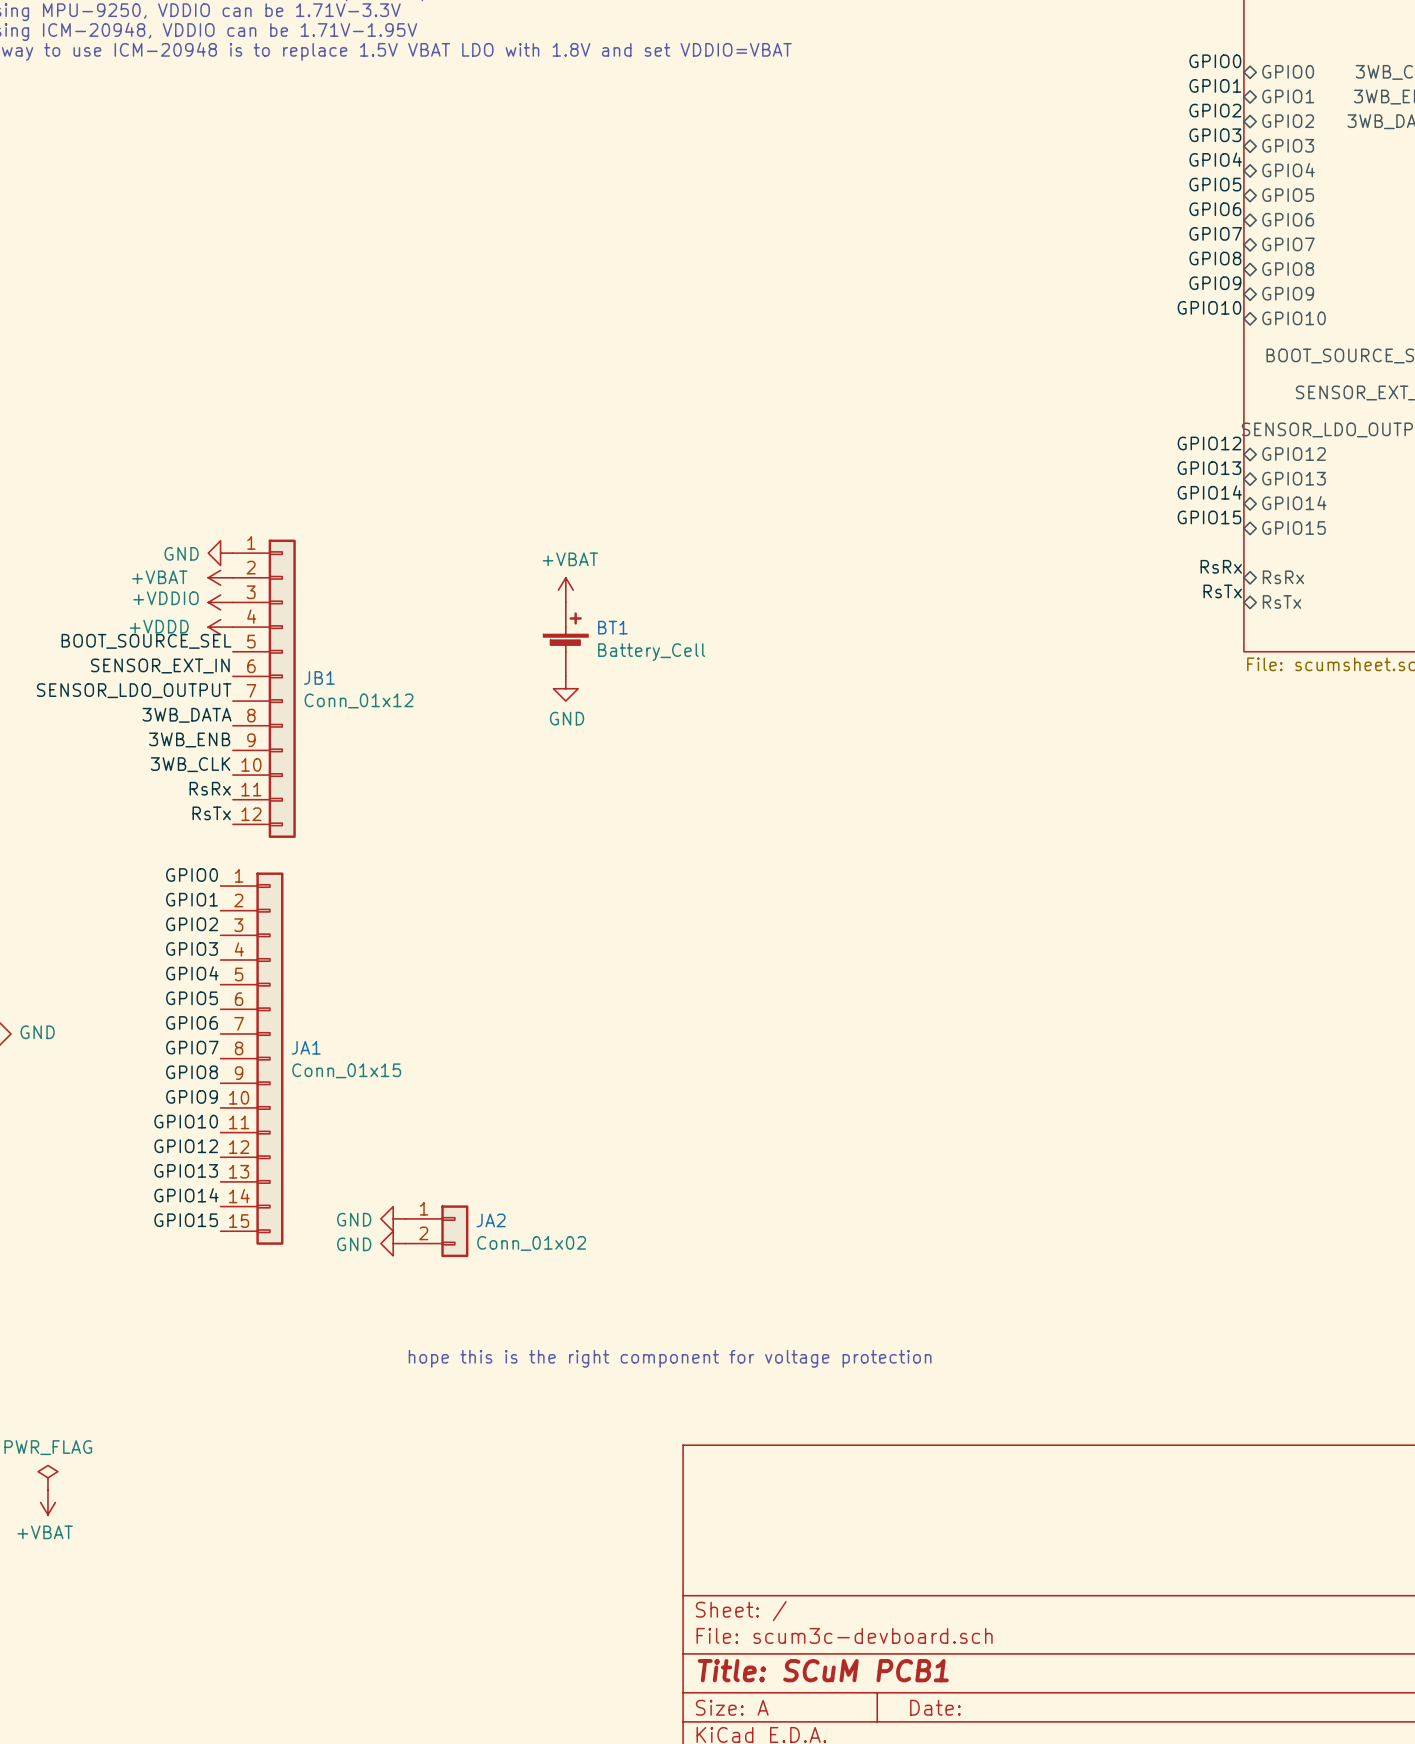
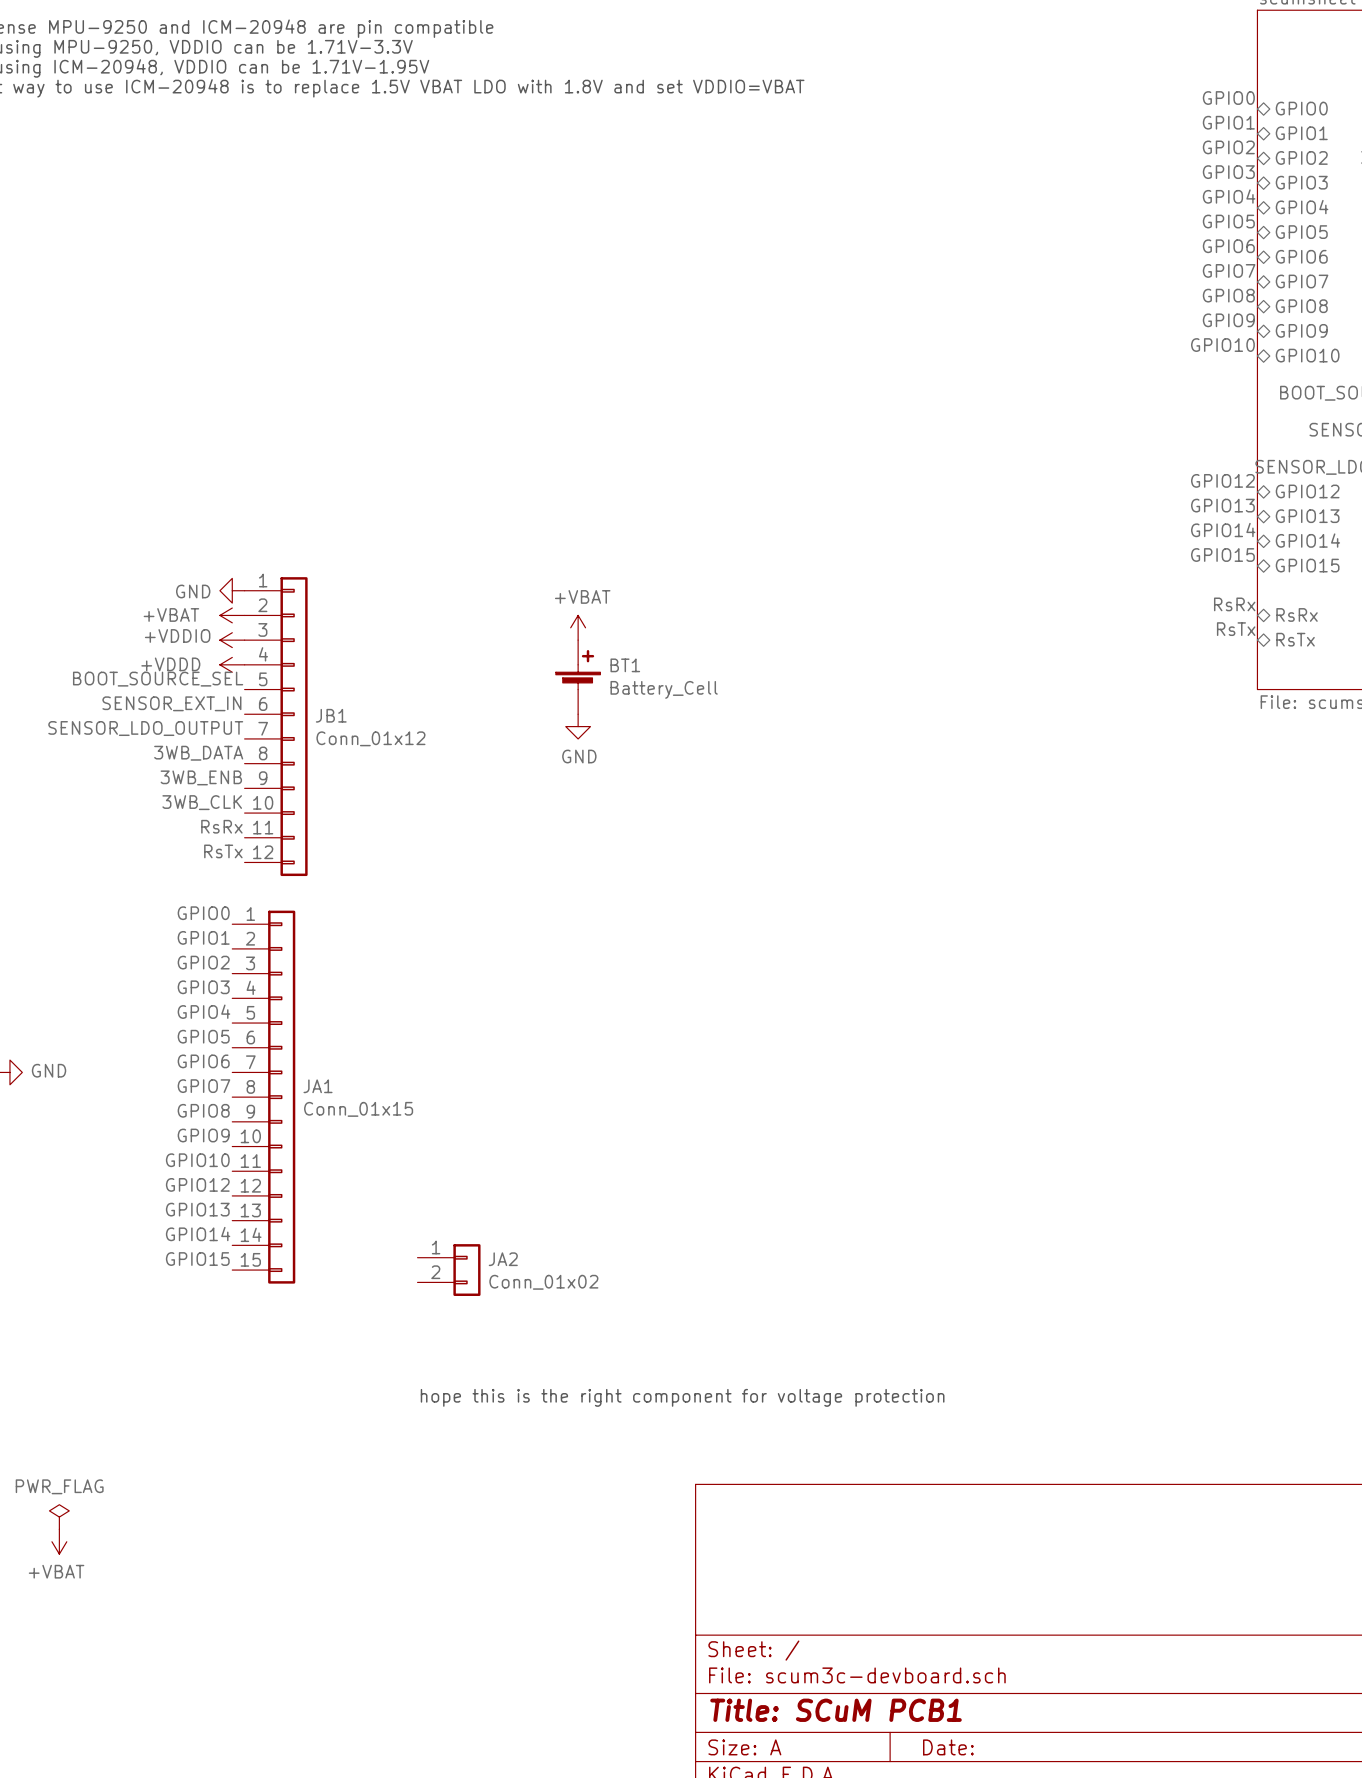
power symbol: GND (393, 1218) -> none
power symbol: GND (393, 1243) -> none

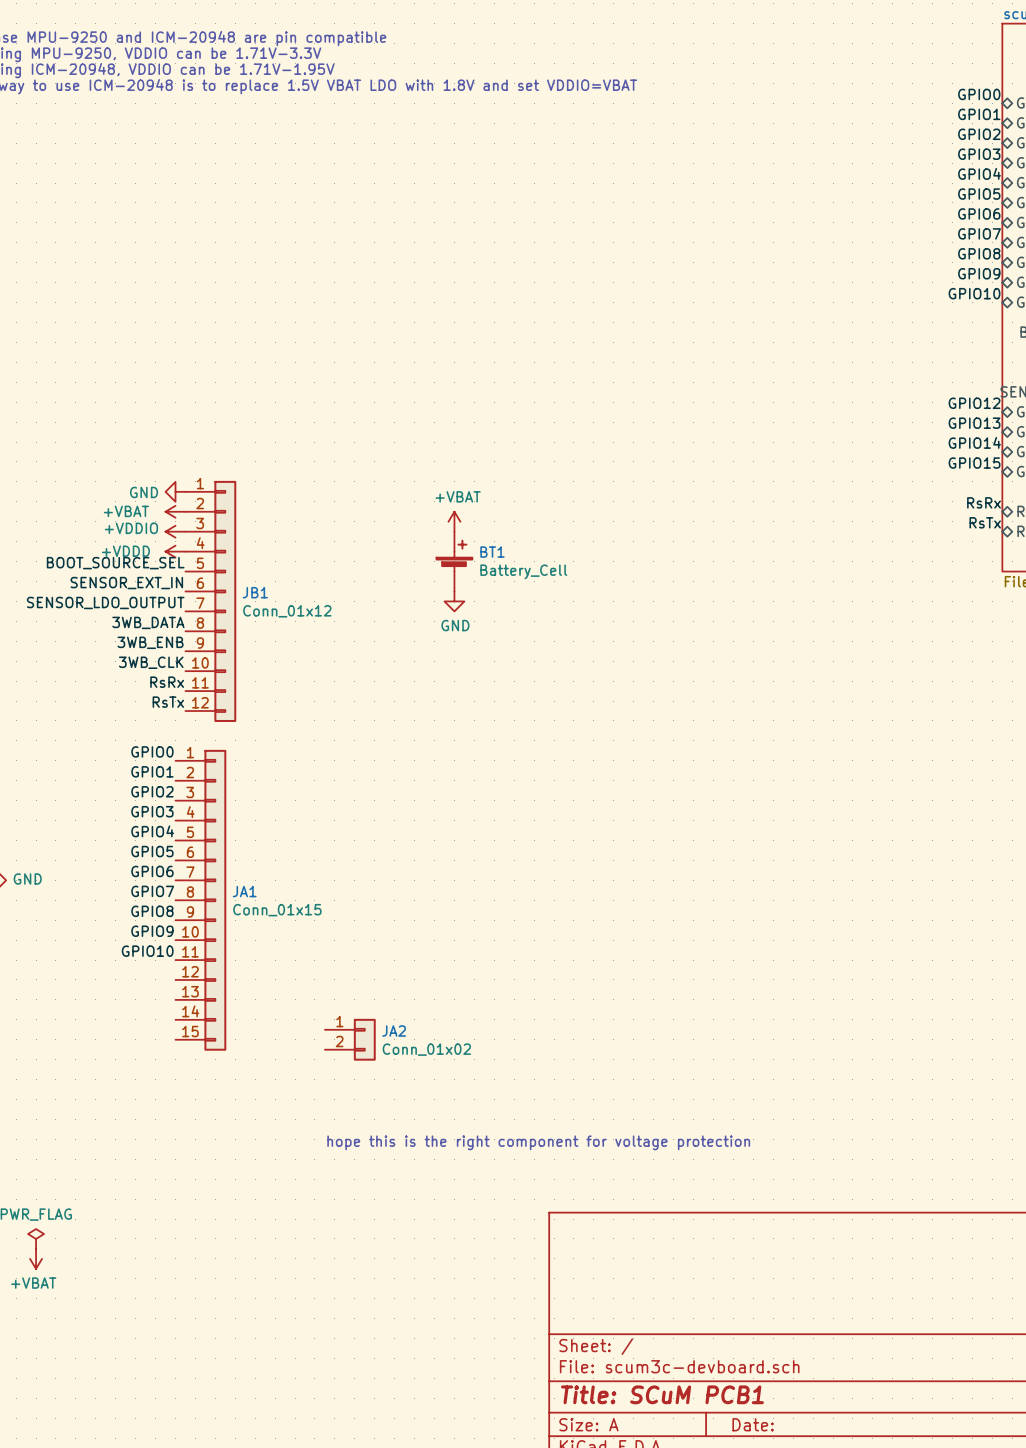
label: GPIO12 (197, 1184) -> none
label: GPIO13 (197, 1209) -> none
label: GPIO14 (198, 1234) -> none
label: GPIO15 (197, 1259) -> none

